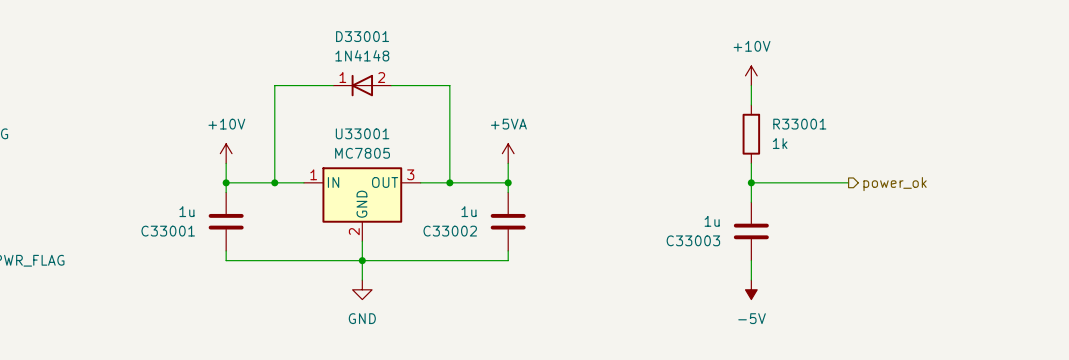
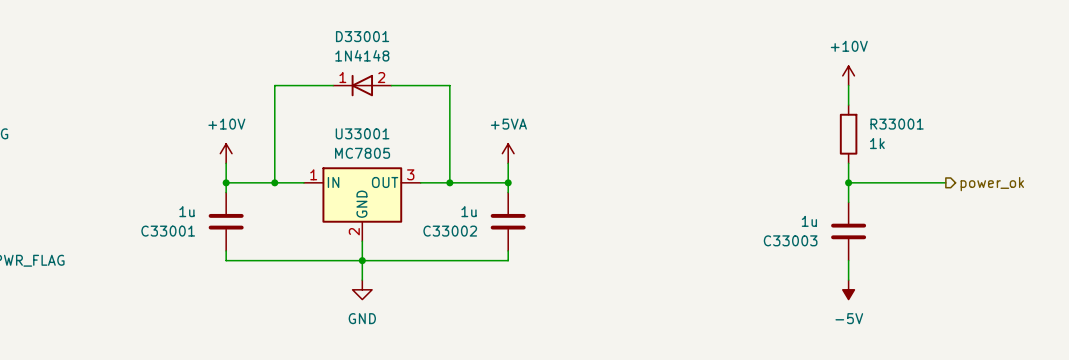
power symbol position: +10V (751, 75) -> +10V (848, 75)
wire: (751, 85) (751, 105) -> (848, 85) (848, 105)
R33001 position: (751, 134) -> (848, 134)
wire: (751, 163) (751, 202) -> (848, 163) (848, 202)
wire: (751, 182) (848, 182) -> (945, 182) (848, 182)
junction: (751, 182) -> none
junction: none -> (848, 182)
hierarchical label position: power_ok (895, 184) -> power_ok (992, 184)
C33003 position: (751, 231) -> (848, 231)
wire: (751, 260) (751, 280) -> (848, 260) (848, 280)
power symbol position: -5V (751, 289) -> -5V (848, 289)

